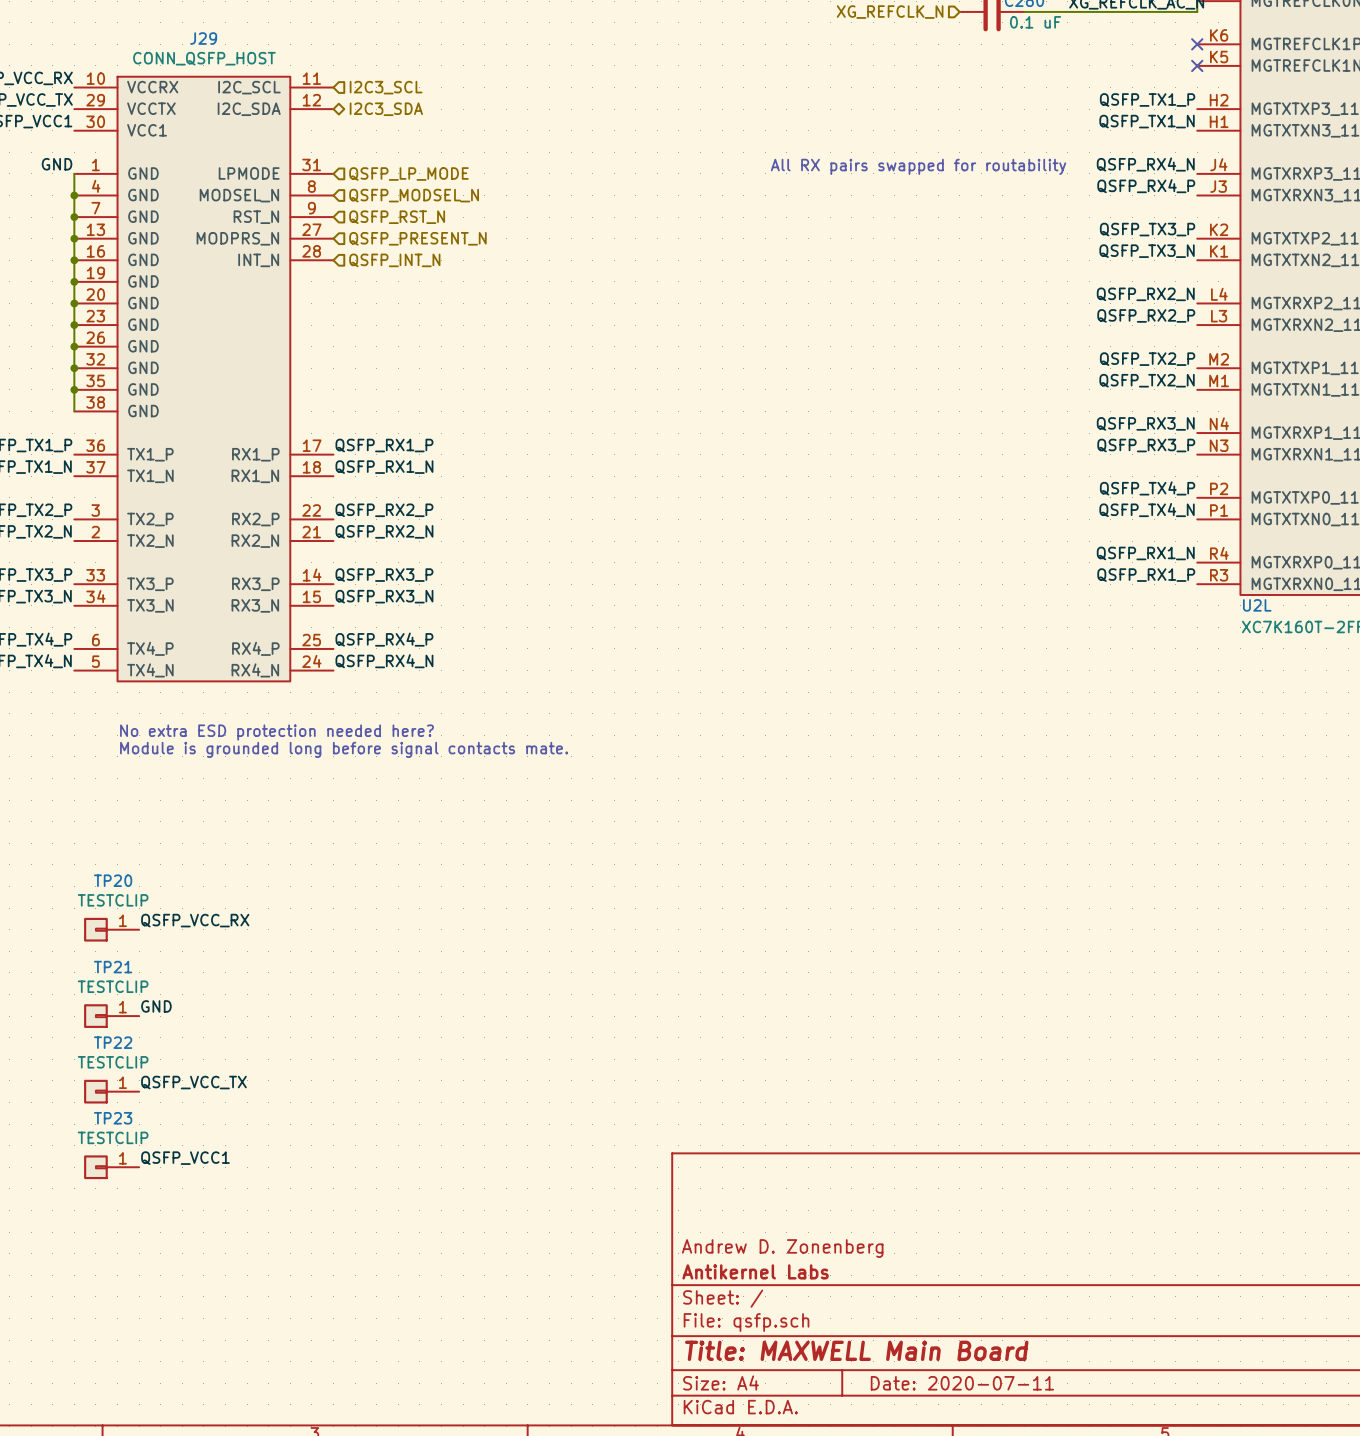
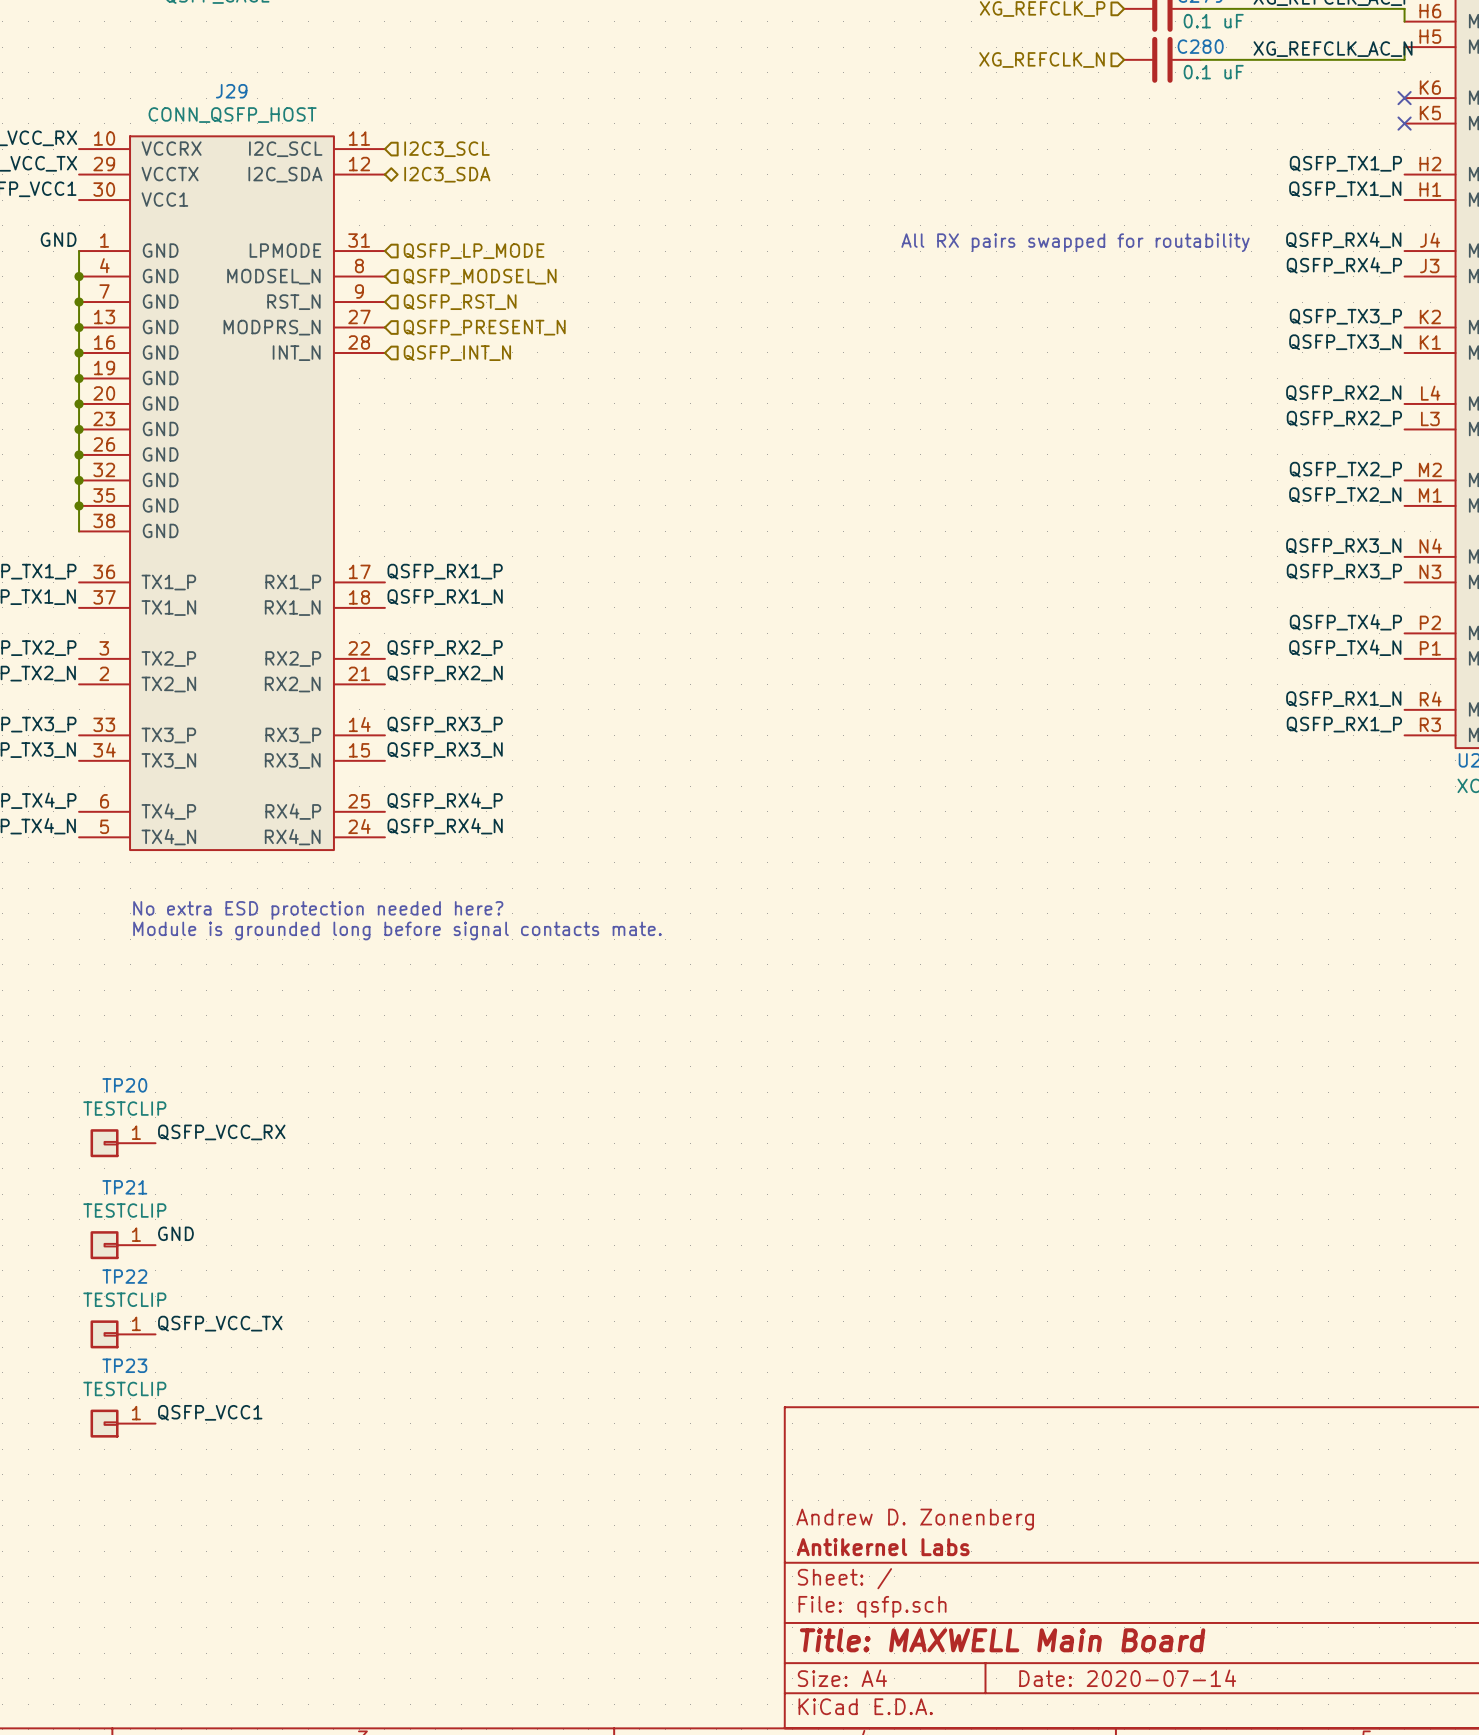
title block: Date: 2020-07-11 (962, 1383) -> Date: 2020-07-14 (1127, 1678)

